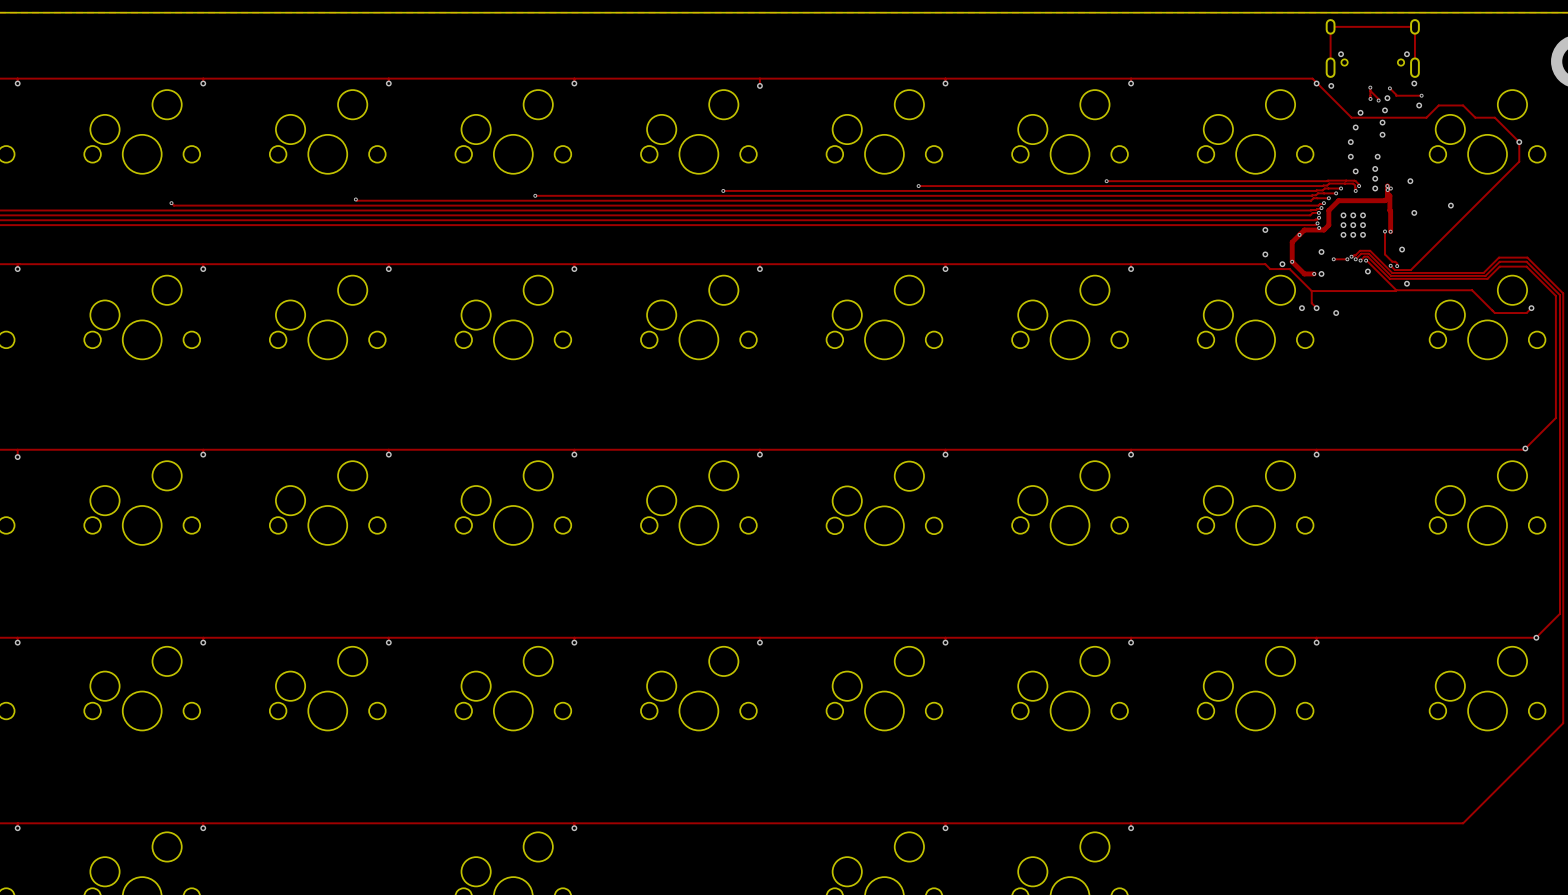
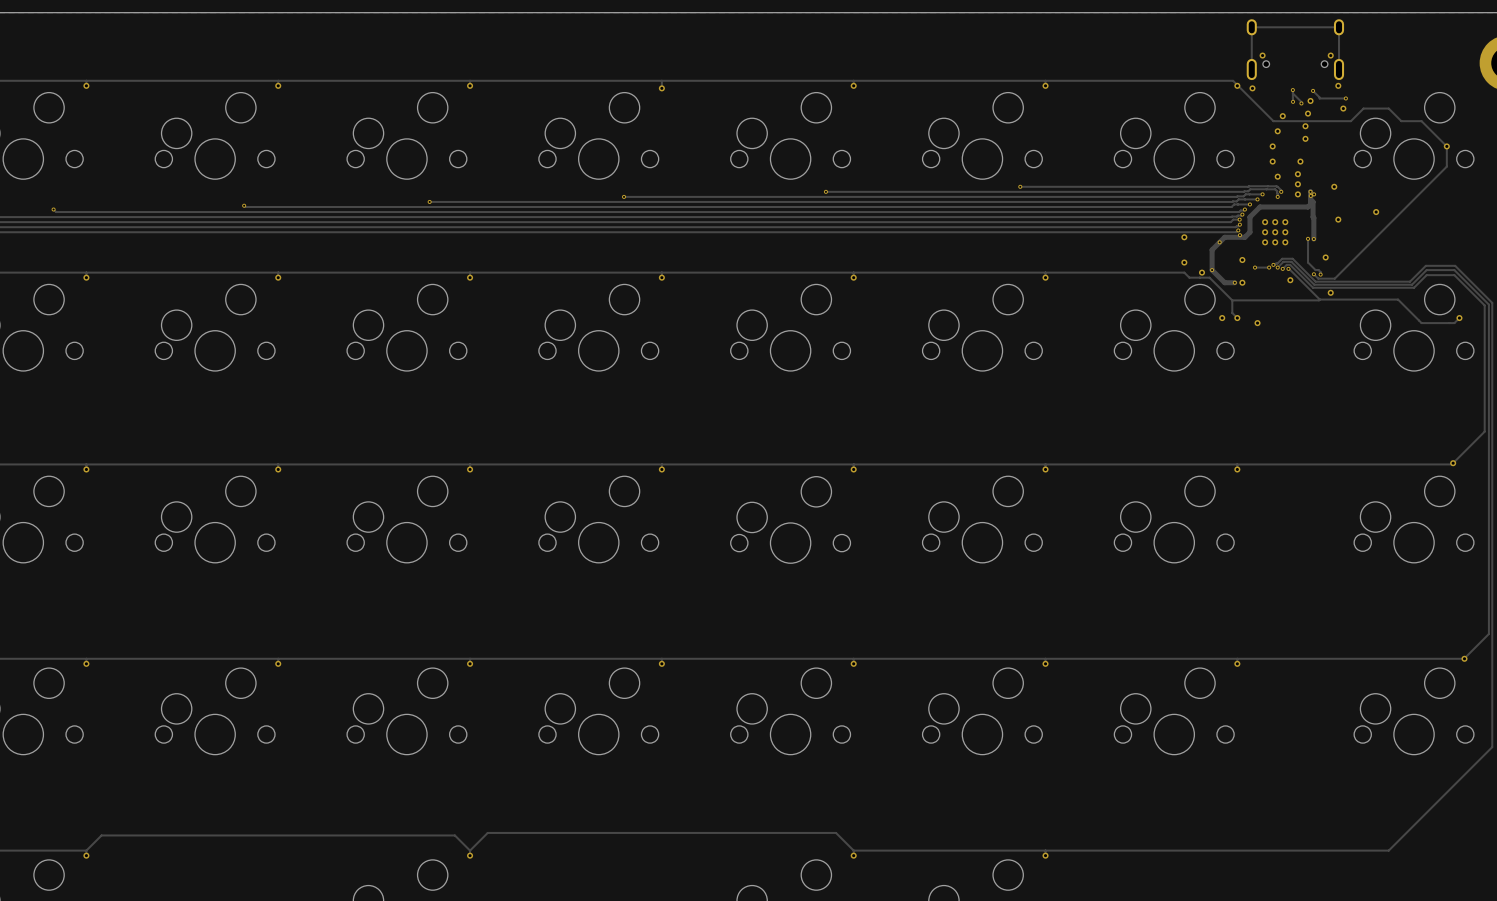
track: (203, 823) (945, 823) -> (86, 850) (101, 835) (454, 835) (470, 850) (487, 832) (836, 832) (853, 850)

